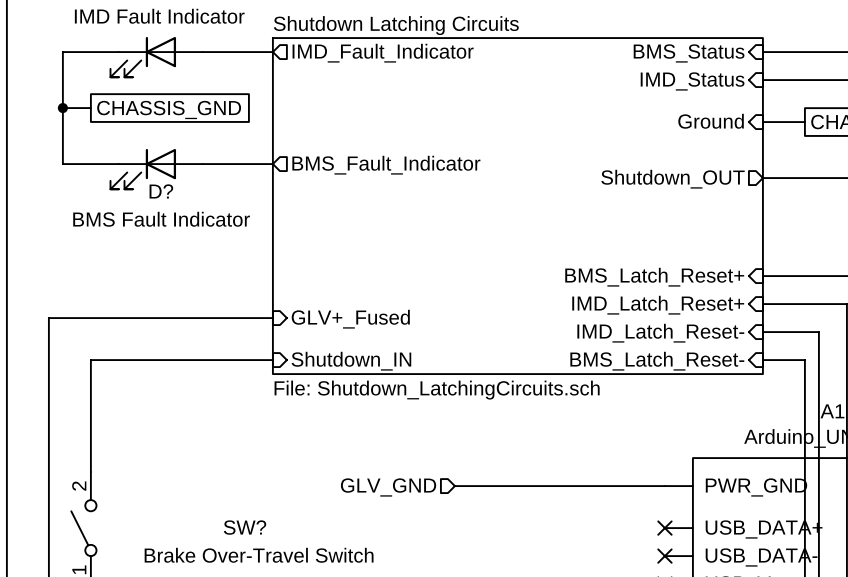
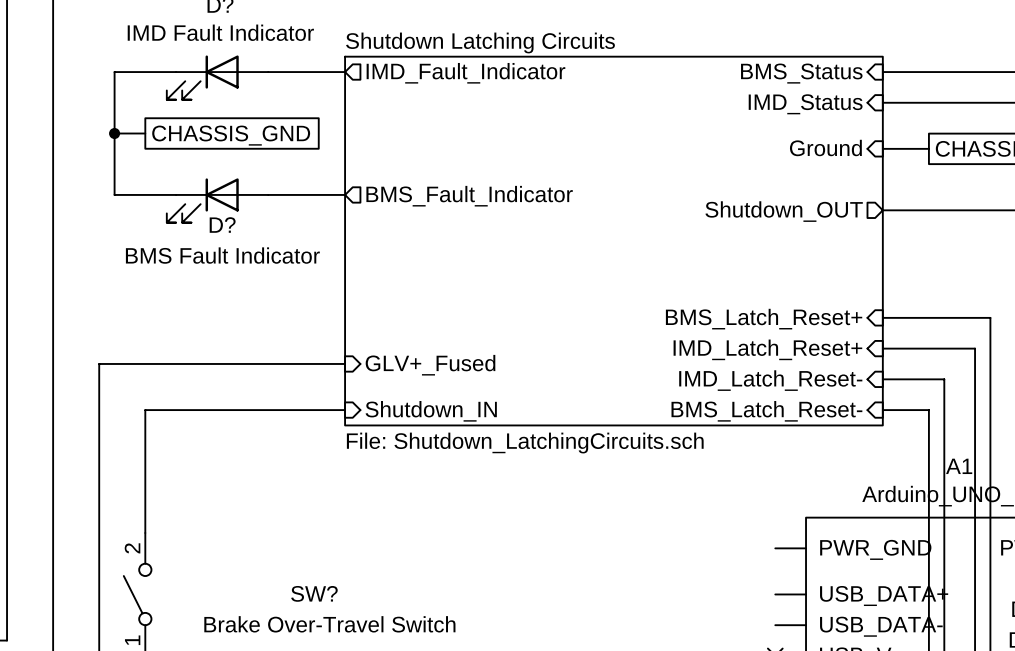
wire: (454, 486) (664, 486) -> none
hierarchical label: GLV_GND (388, 487) -> none
no-connect mark: (664, 528) -> none
no-connect mark: (664, 556) -> none

